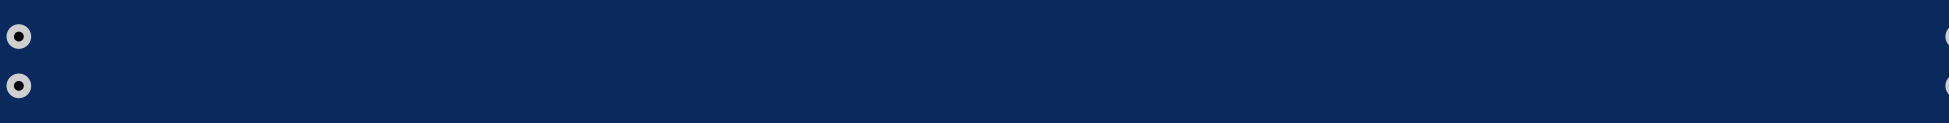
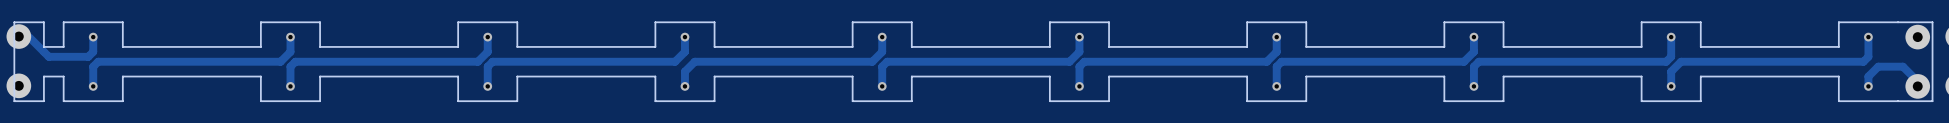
board edge: none -> (1932, 22) (1932, 101) (1838, 101) (1838, 76) (1700, 76) (1700, 101) (1641, 101) (1641, 76) (1503, 76) (1503, 101) (1444, 101) (1444, 76) (1306, 76) (1306, 101) (1247, 101) (1247, 76) (1109, 76) (1109, 101) (1049, 101) (1049, 76) (911, 76) (911, 101) (852, 101) (852, 76) (714, 76) (714, 101) (655, 101) (655, 76) (517, 76) (517, 101) (458, 101) (458, 76) (320, 76) (320, 101) (260, 101) (260, 76) (122, 76) (122, 101) (63, 101) (63, 76) (43, 76) (43, 101) (14, 101) (14, 22) (43, 22) (43, 46) (63, 46) (63, 22) (122, 22) (122, 46) (260, 46) (260, 22) (320, 22) (320, 46) (458, 46) (458, 22) (517, 22) (517, 46) (655, 46) (655, 22) (714, 22) (714, 46) (852, 46) (852, 22) (911, 22) (911, 46) (1049, 46) (1049, 22) (1109, 22) (1109, 46) (1247, 46) (1247, 22) (1306, 22) (1306, 46) (1444, 46) (1444, 22) (1503, 22) (1503, 46) (1641, 46) (1641, 22) (1700, 22) (1700, 46) (1838, 46) (1838, 22) (1932, 22)
track: none -> (93, 37) (93, 51) (88, 56) (48, 56) (29, 37)
via: none -> (93, 37)
track: none -> (290, 37) (290, 51) (280, 61) (98, 61) (93, 66) (93, 86)
via: none -> (290, 37)
track: none -> (487, 37) (487, 51) (477, 61) (295, 61) (290, 66) (290, 86)
via: none -> (487, 37)
track: none -> (684, 37) (684, 51) (675, 61) (492, 61) (487, 66) (487, 86)
via: none -> (684, 37)
track: none -> (882, 37) (882, 51) (872, 61) (694, 61) (684, 71) (684, 86)
via: none -> (882, 37)
track: none -> (1079, 37) (1079, 51) (1069, 61) (887, 61) (882, 66) (882, 86)
via: none -> (1079, 37)
track: none -> (1276, 37) (1276, 51) (1266, 61) (1084, 61) (1079, 66) (1079, 86)
via: none -> (1276, 37)
track: none -> (1473, 37) (1473, 51) (1464, 61) (1281, 61) (1276, 66) (1276, 86)
via: none -> (1473, 37)
track: none -> (1671, 37) (1671, 56) (1666, 61) (1478, 61) (1473, 66) (1473, 86)
via: none -> (1671, 37)
track: none -> (1868, 37) (1868, 56) (1863, 61) (1681, 61) (1671, 71) (1671, 86)
via: none -> (1868, 37)
part: none -> (1917, 37)
via: none -> (93, 86)
via: none -> (290, 86)
via: none -> (487, 86)
via: none -> (684, 86)
via: none -> (882, 86)
via: none -> (1079, 86)
via: none -> (1276, 86)
via: none -> (1473, 86)
via: none -> (1671, 86)
via: none -> (1868, 86)
track: none -> (1917, 86) (1917, 81) (1902, 66) (1878, 66) (1868, 76) (1868, 86)
part: none -> (1917, 86)

